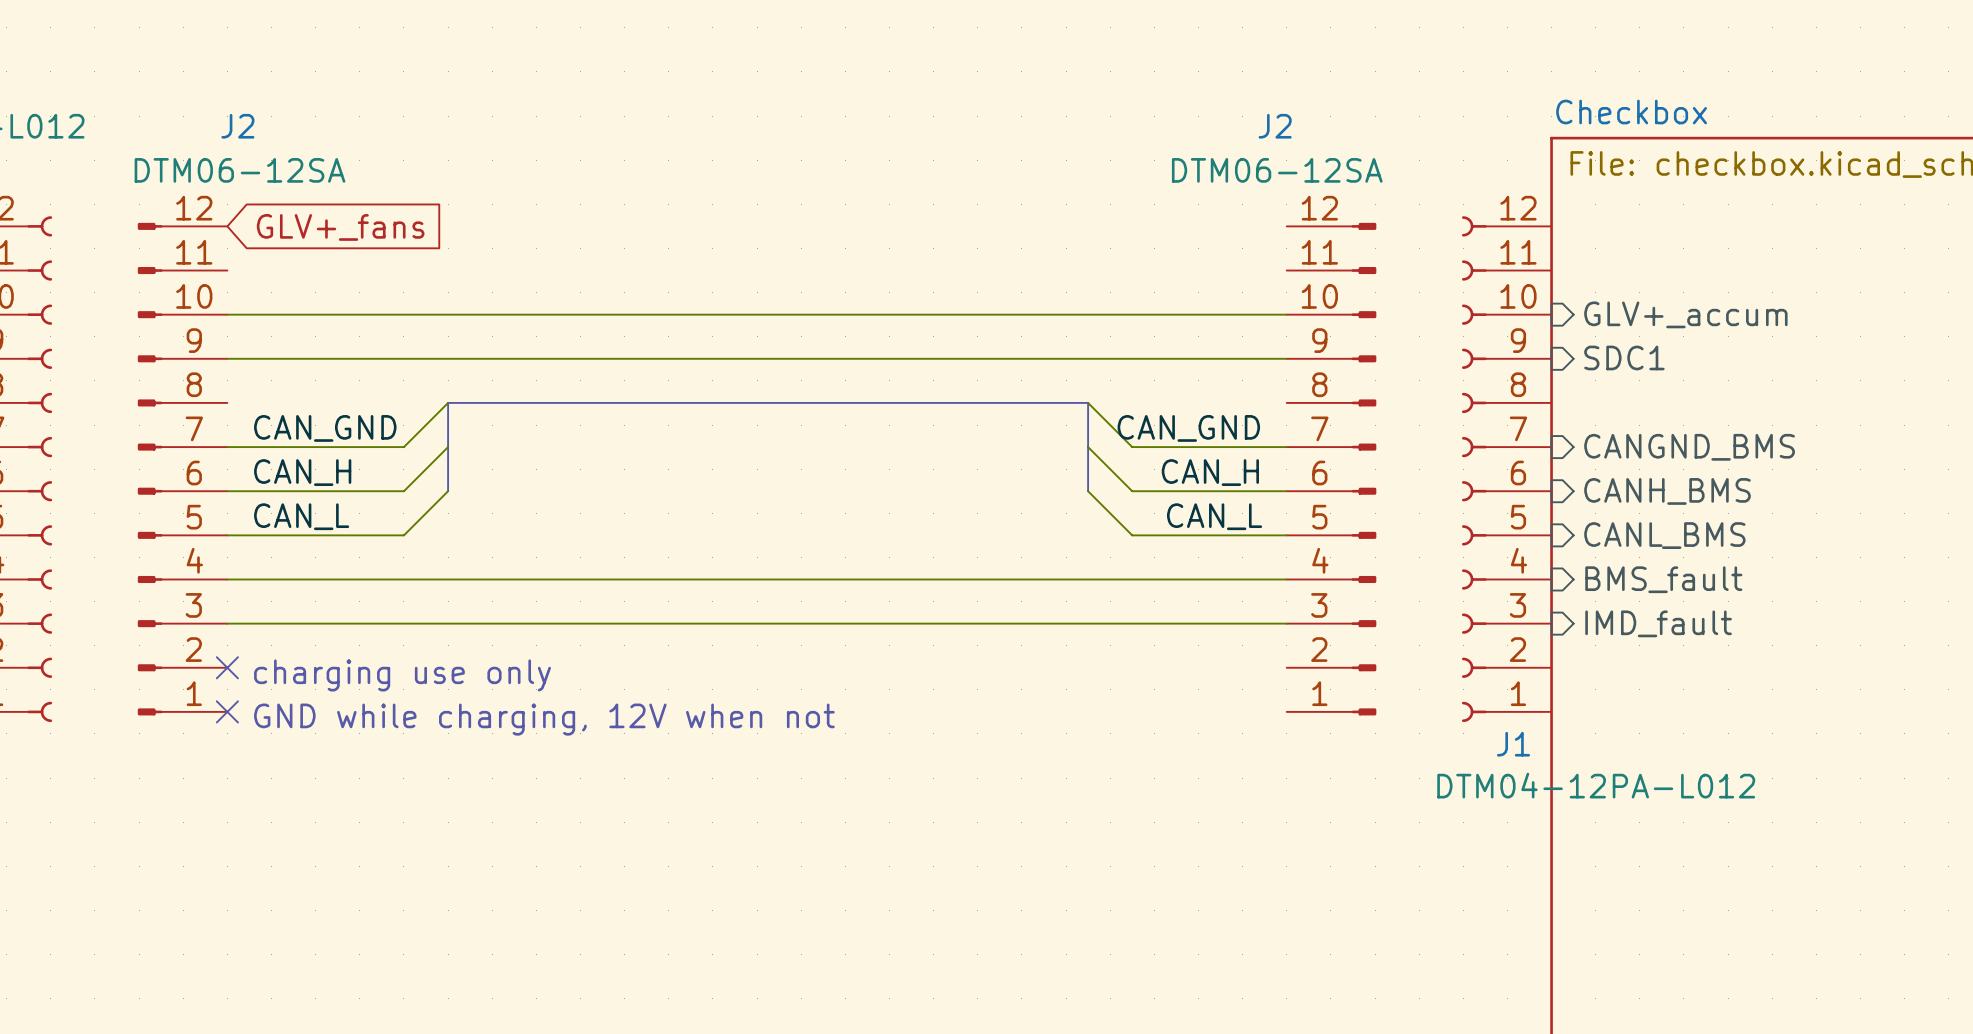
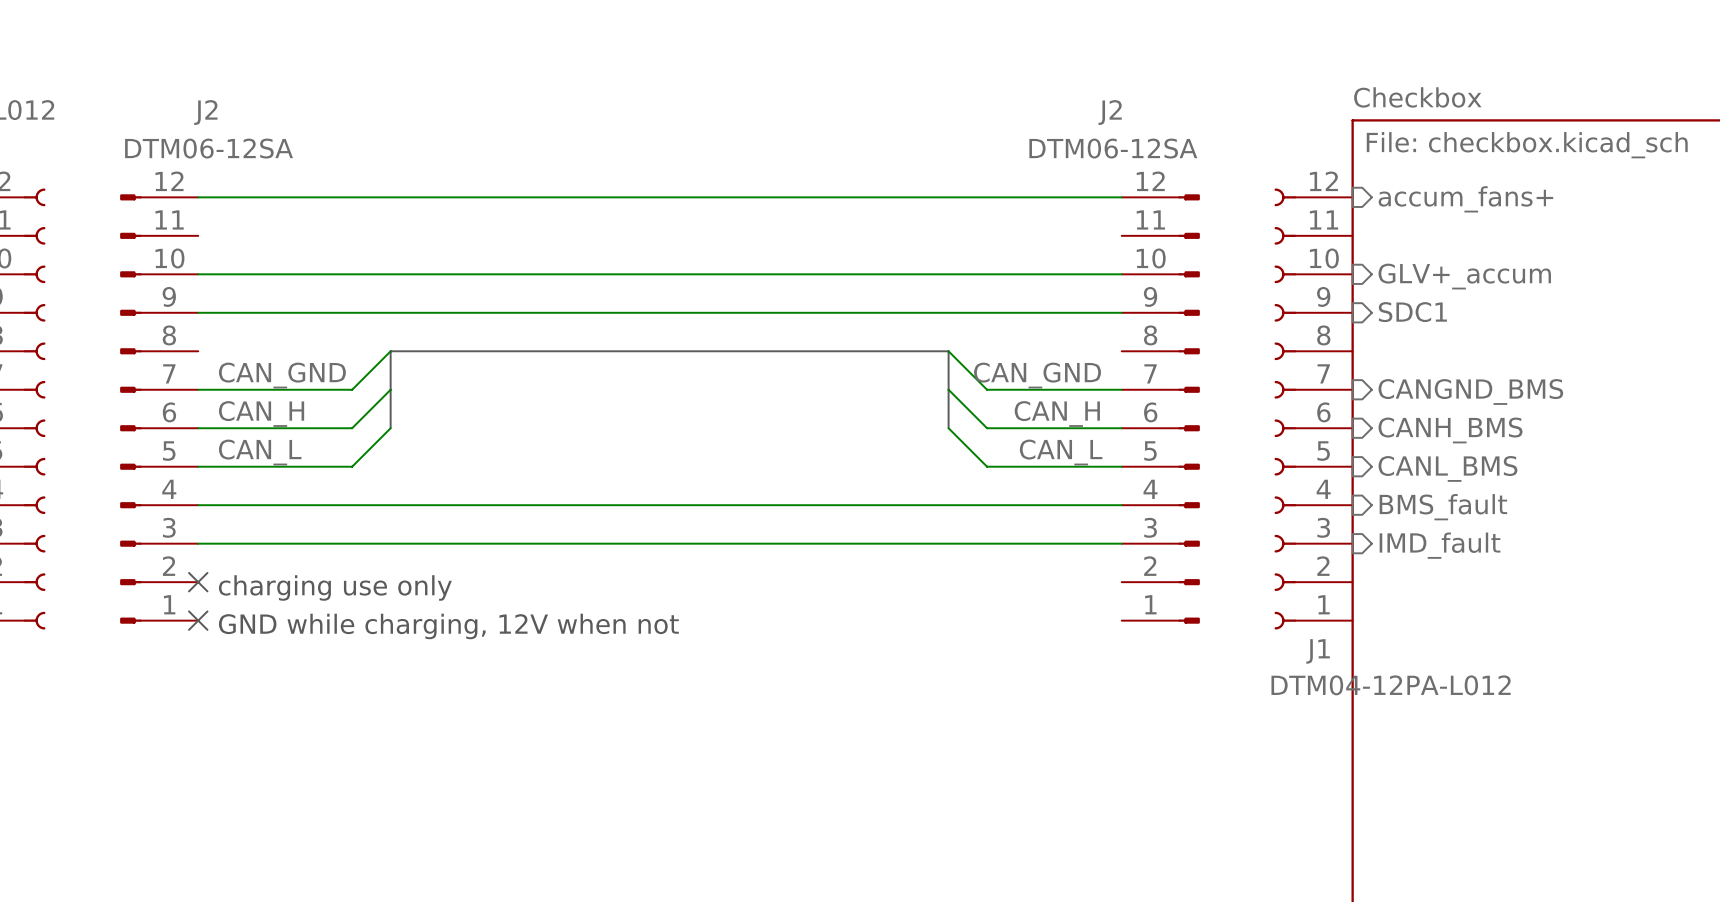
wire: none -> (198, 197) (1121, 197)
sheet pin: none -> accum_fans+ (1465, 199)
global label: GLV+_fans (340, 227) -> none

